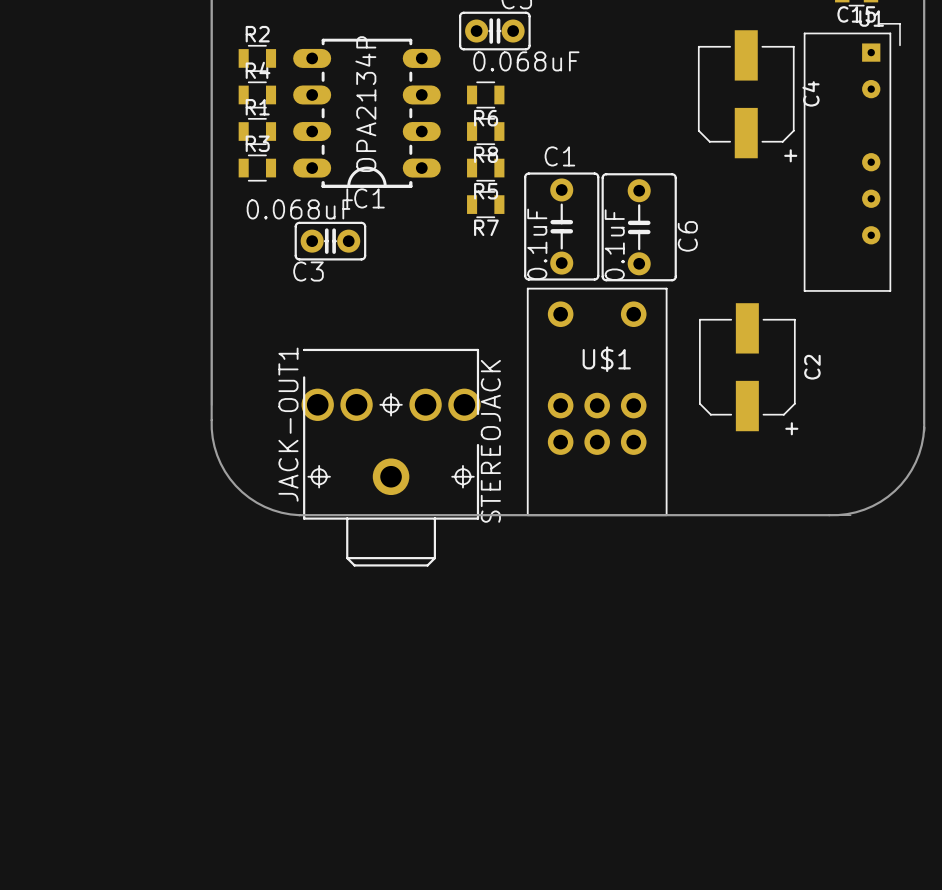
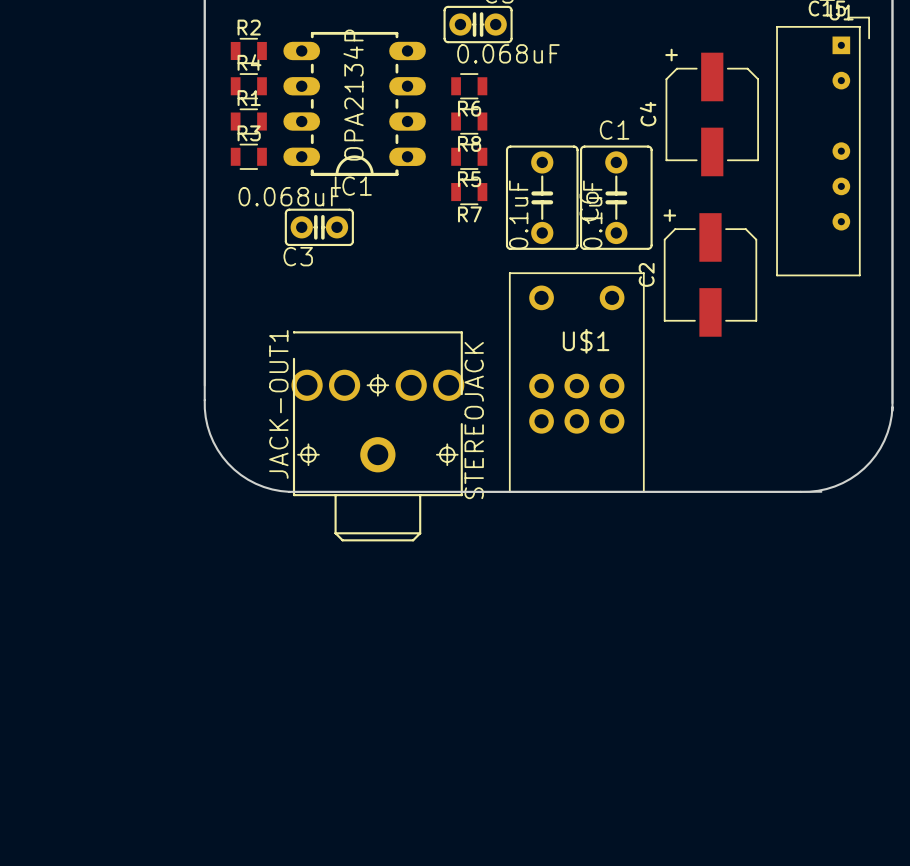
C4 rotation: 0° (746, 94) -> 180° (712, 114)
C1 position: (561, 226) -> (616, 197)
C6 position: (639, 227) -> (542, 197)
C2 rotation: 0° (747, 367) -> 180° (710, 274)
C2 position: (747, 367) -> (710, 274)

